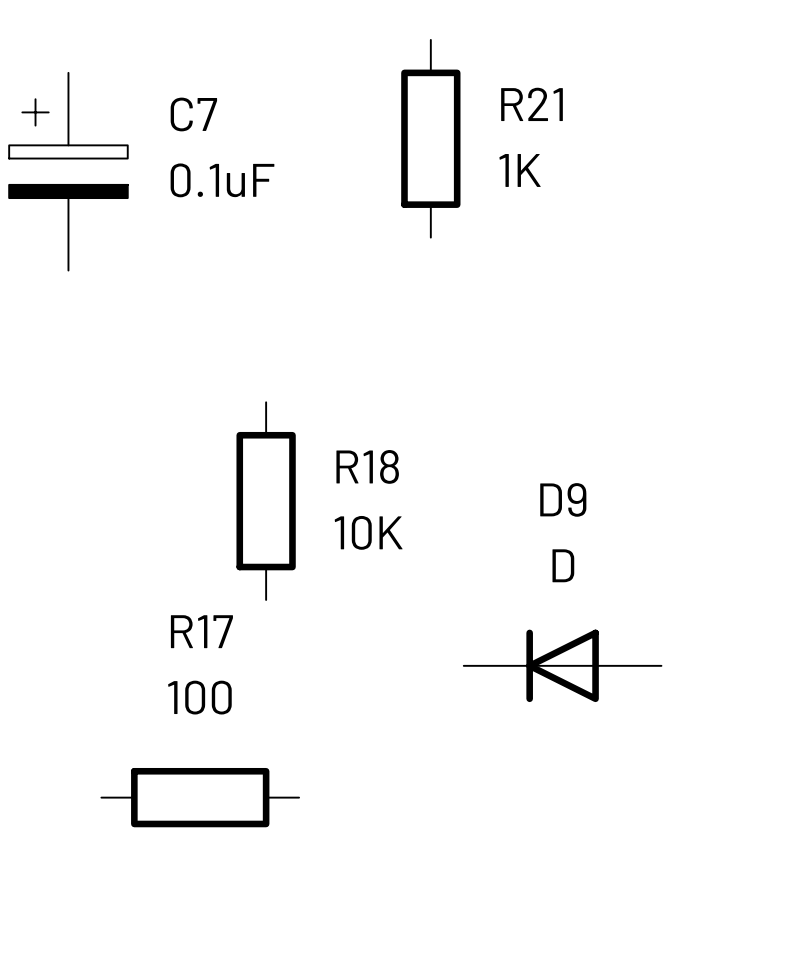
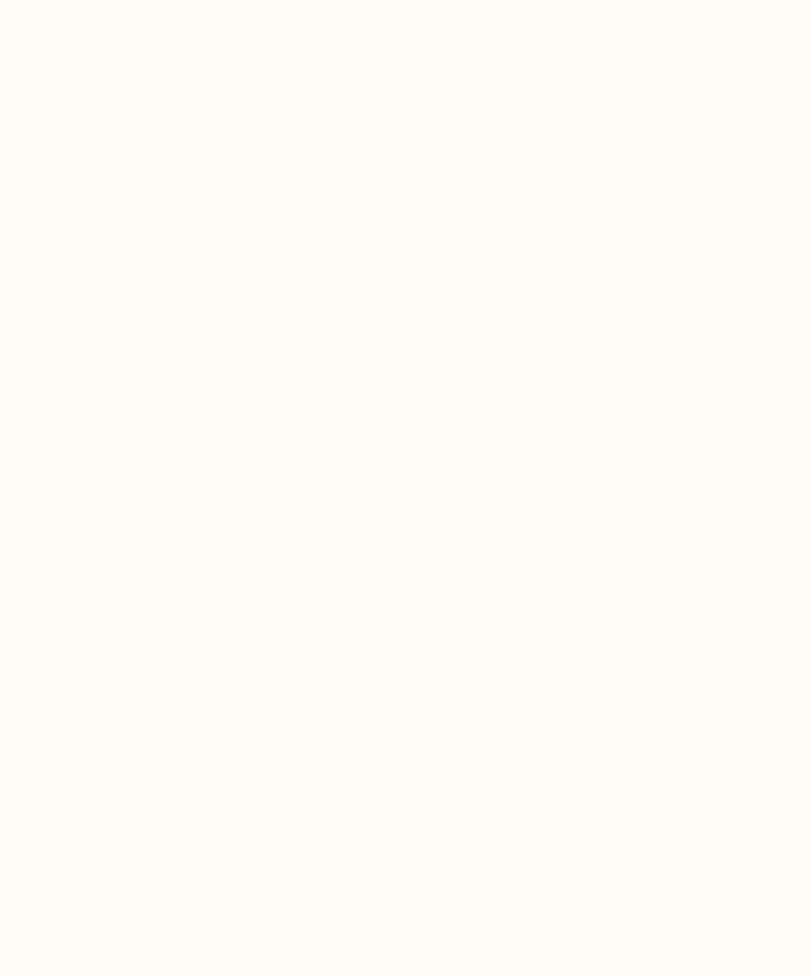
R21: 1K (430, 138) -> none
C7: 0.1uF (68, 171) -> none
R18: 10K (266, 501) -> none
D9: D (562, 665) -> none
R17: 100 (200, 797) -> none

